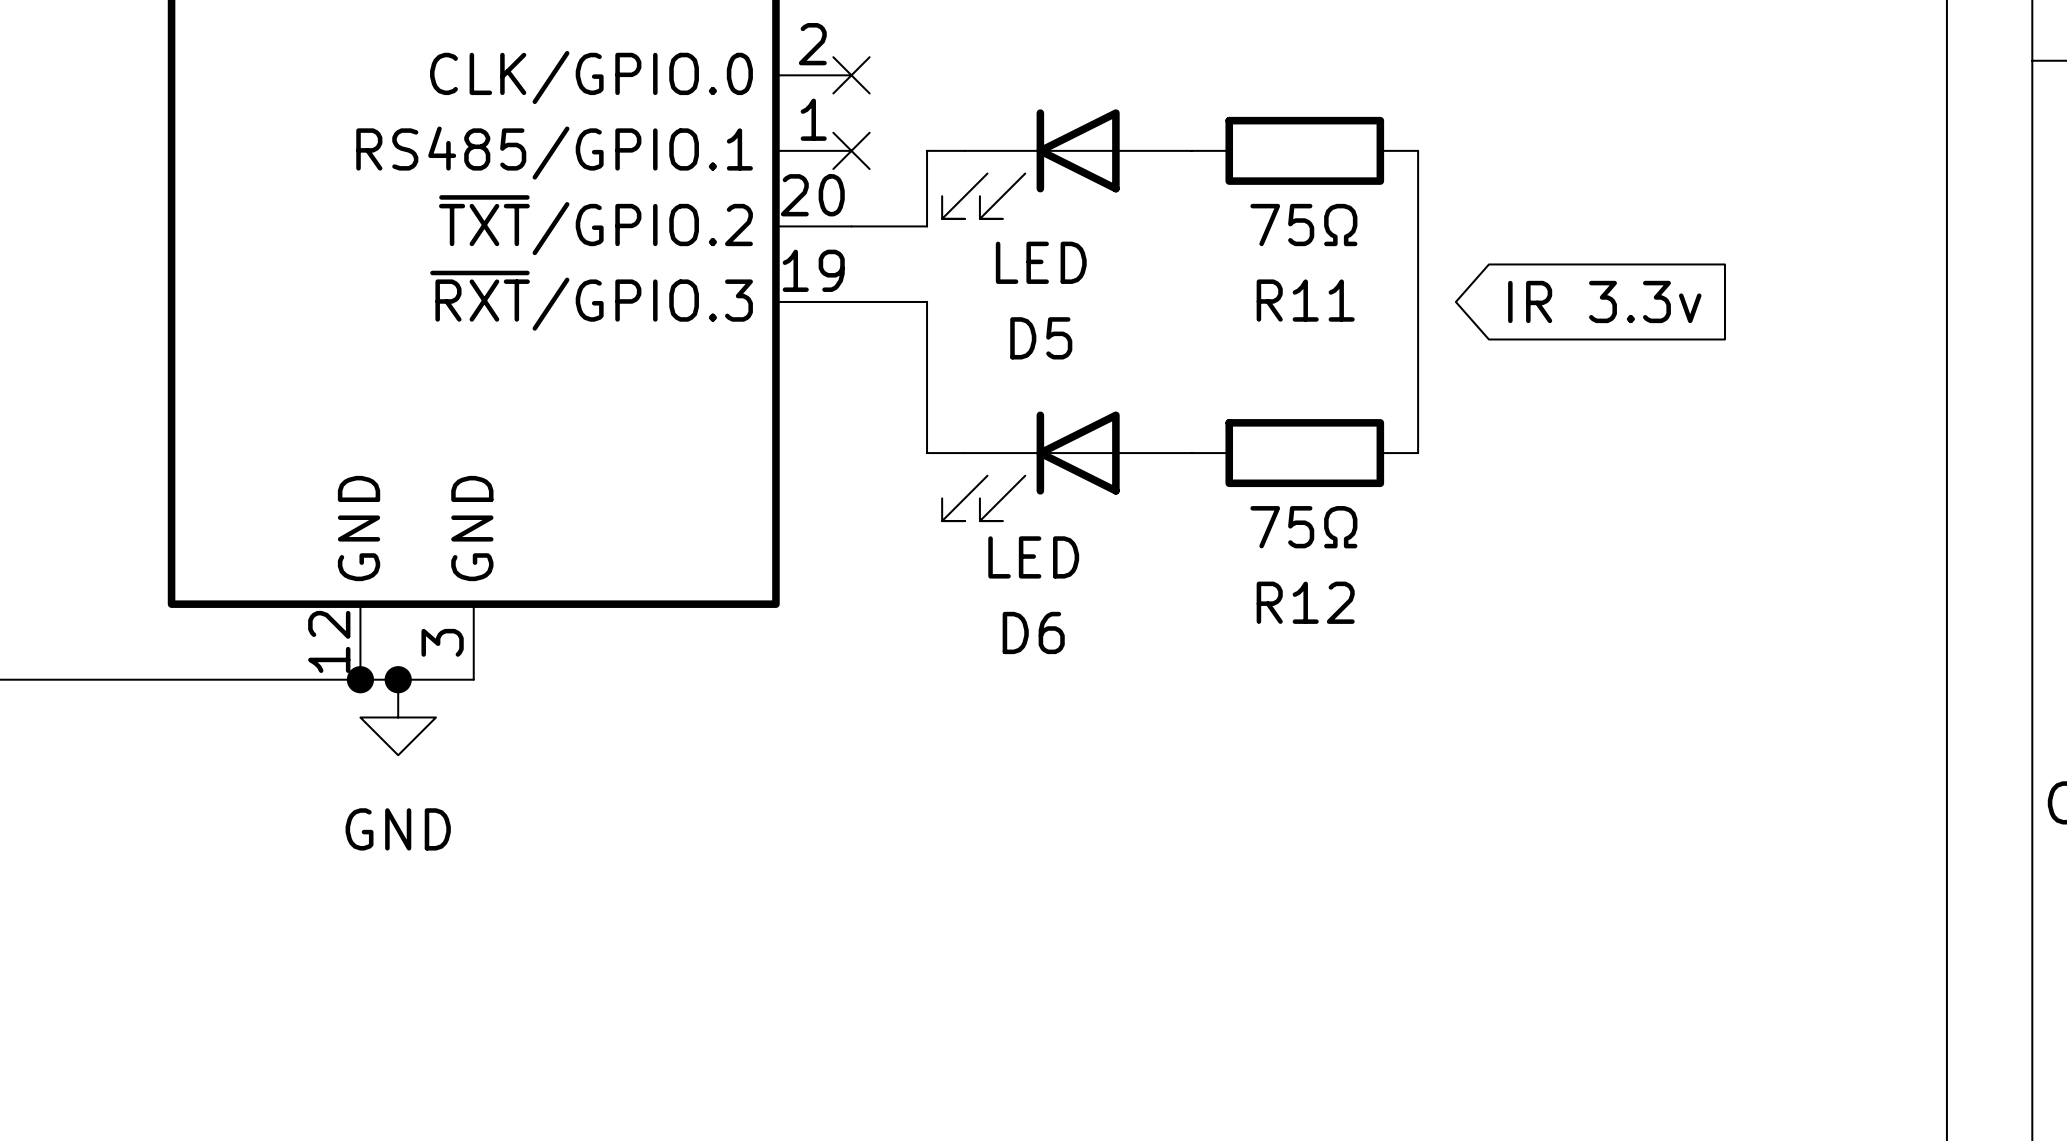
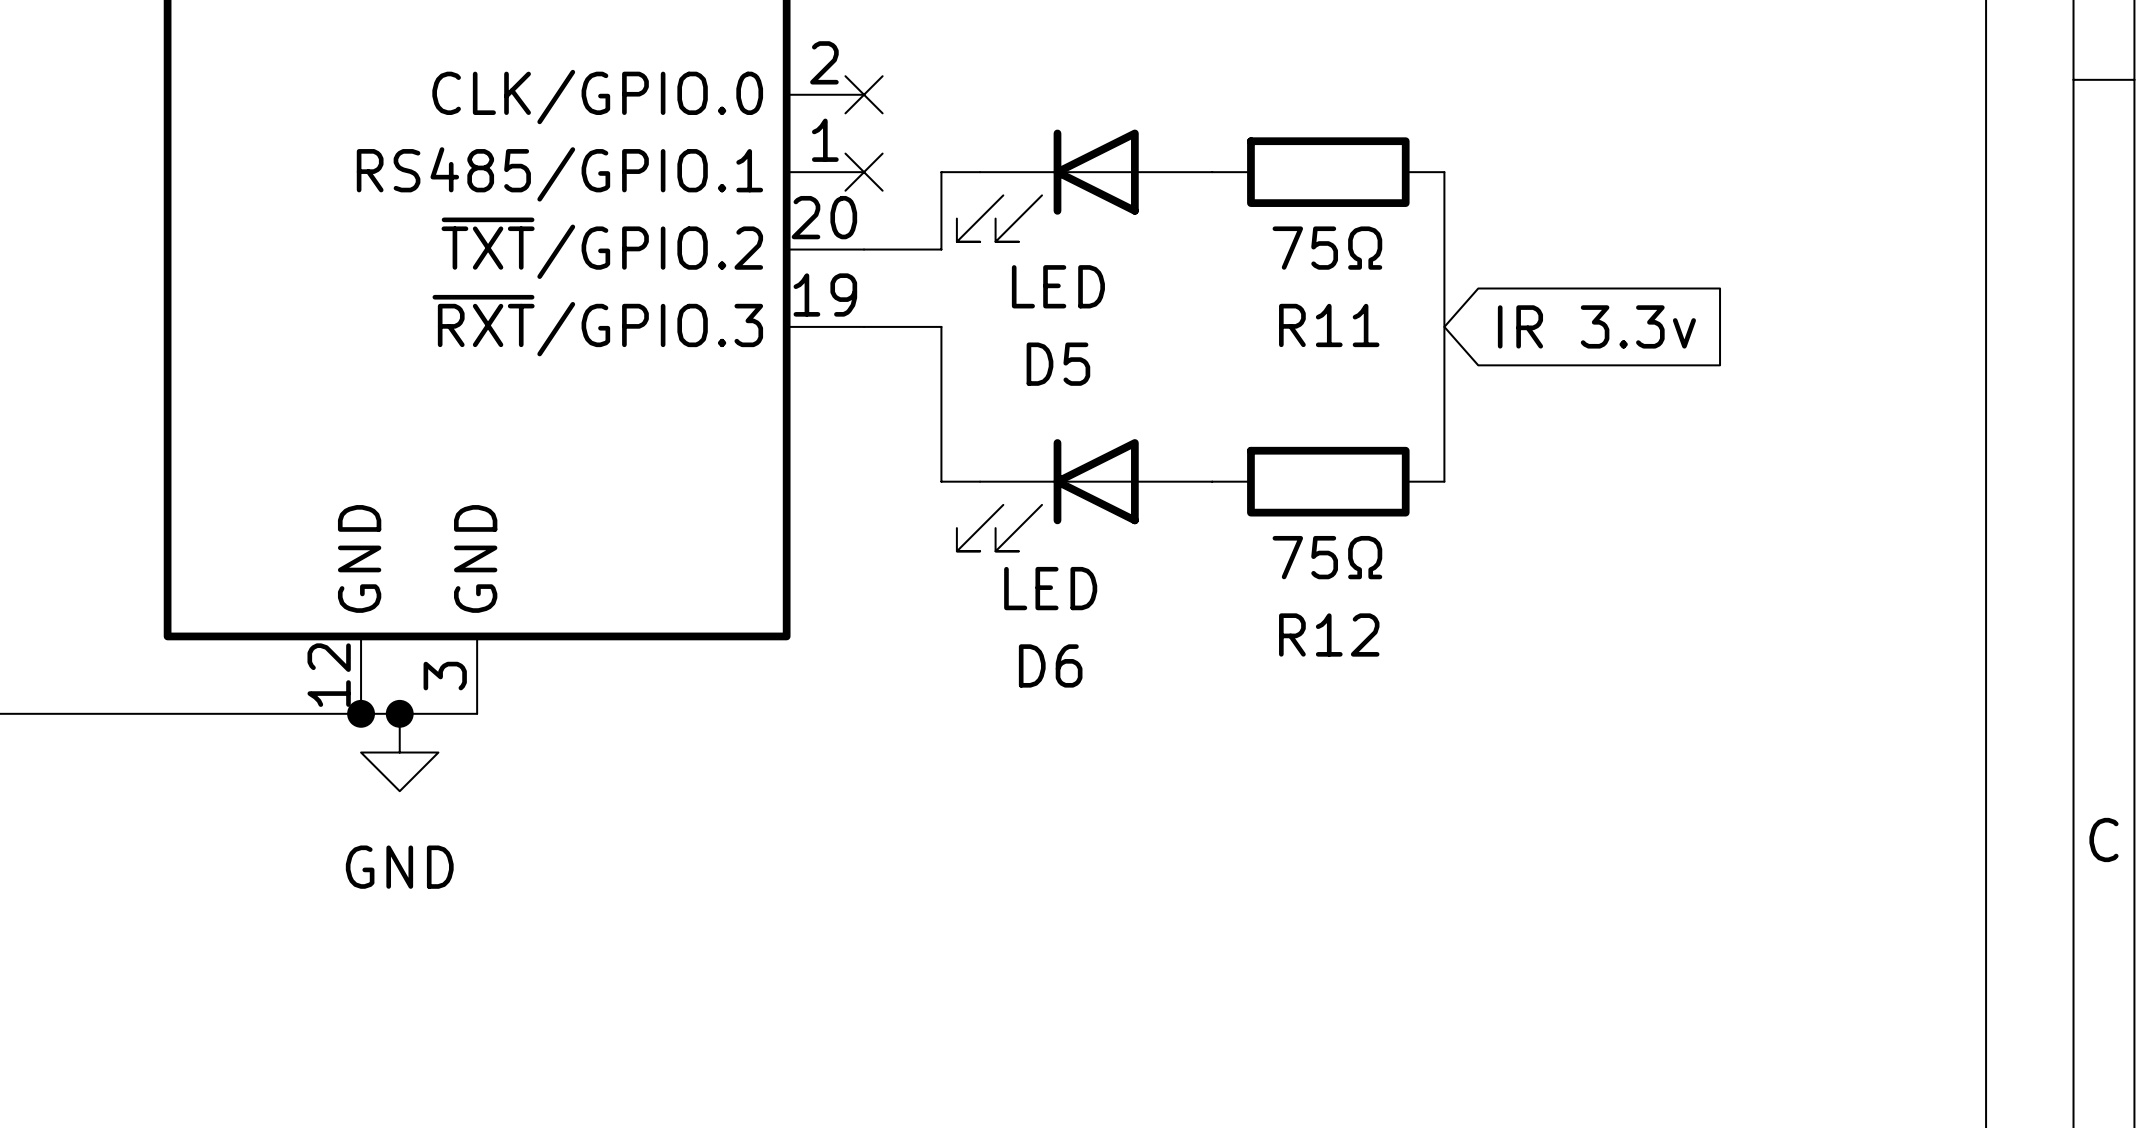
global label position: IR 3.3v (1604, 301) -> IR 3.3v (1596, 326)

